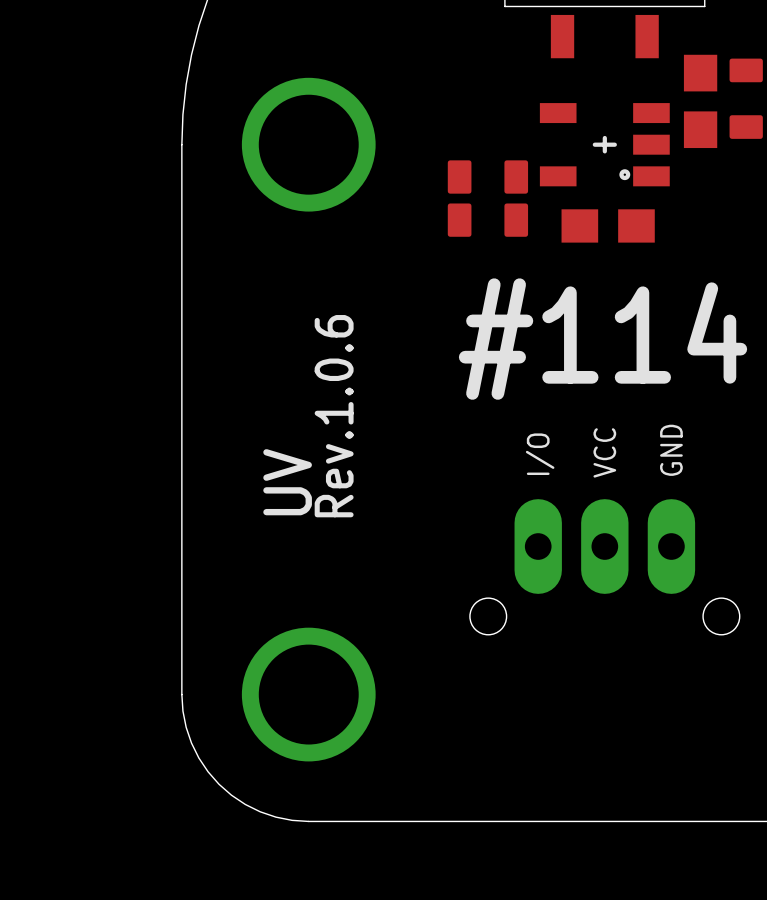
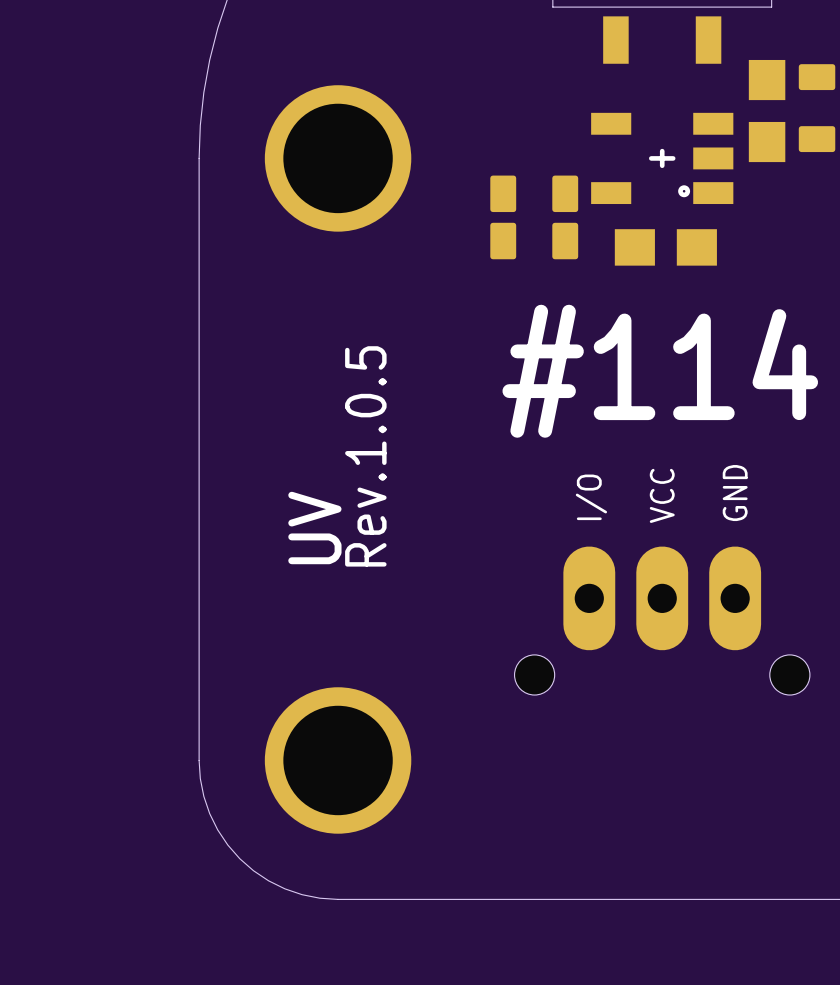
text: Rev.1.0.6 (334, 416) -> Rev.1.0.5 (365, 456)

